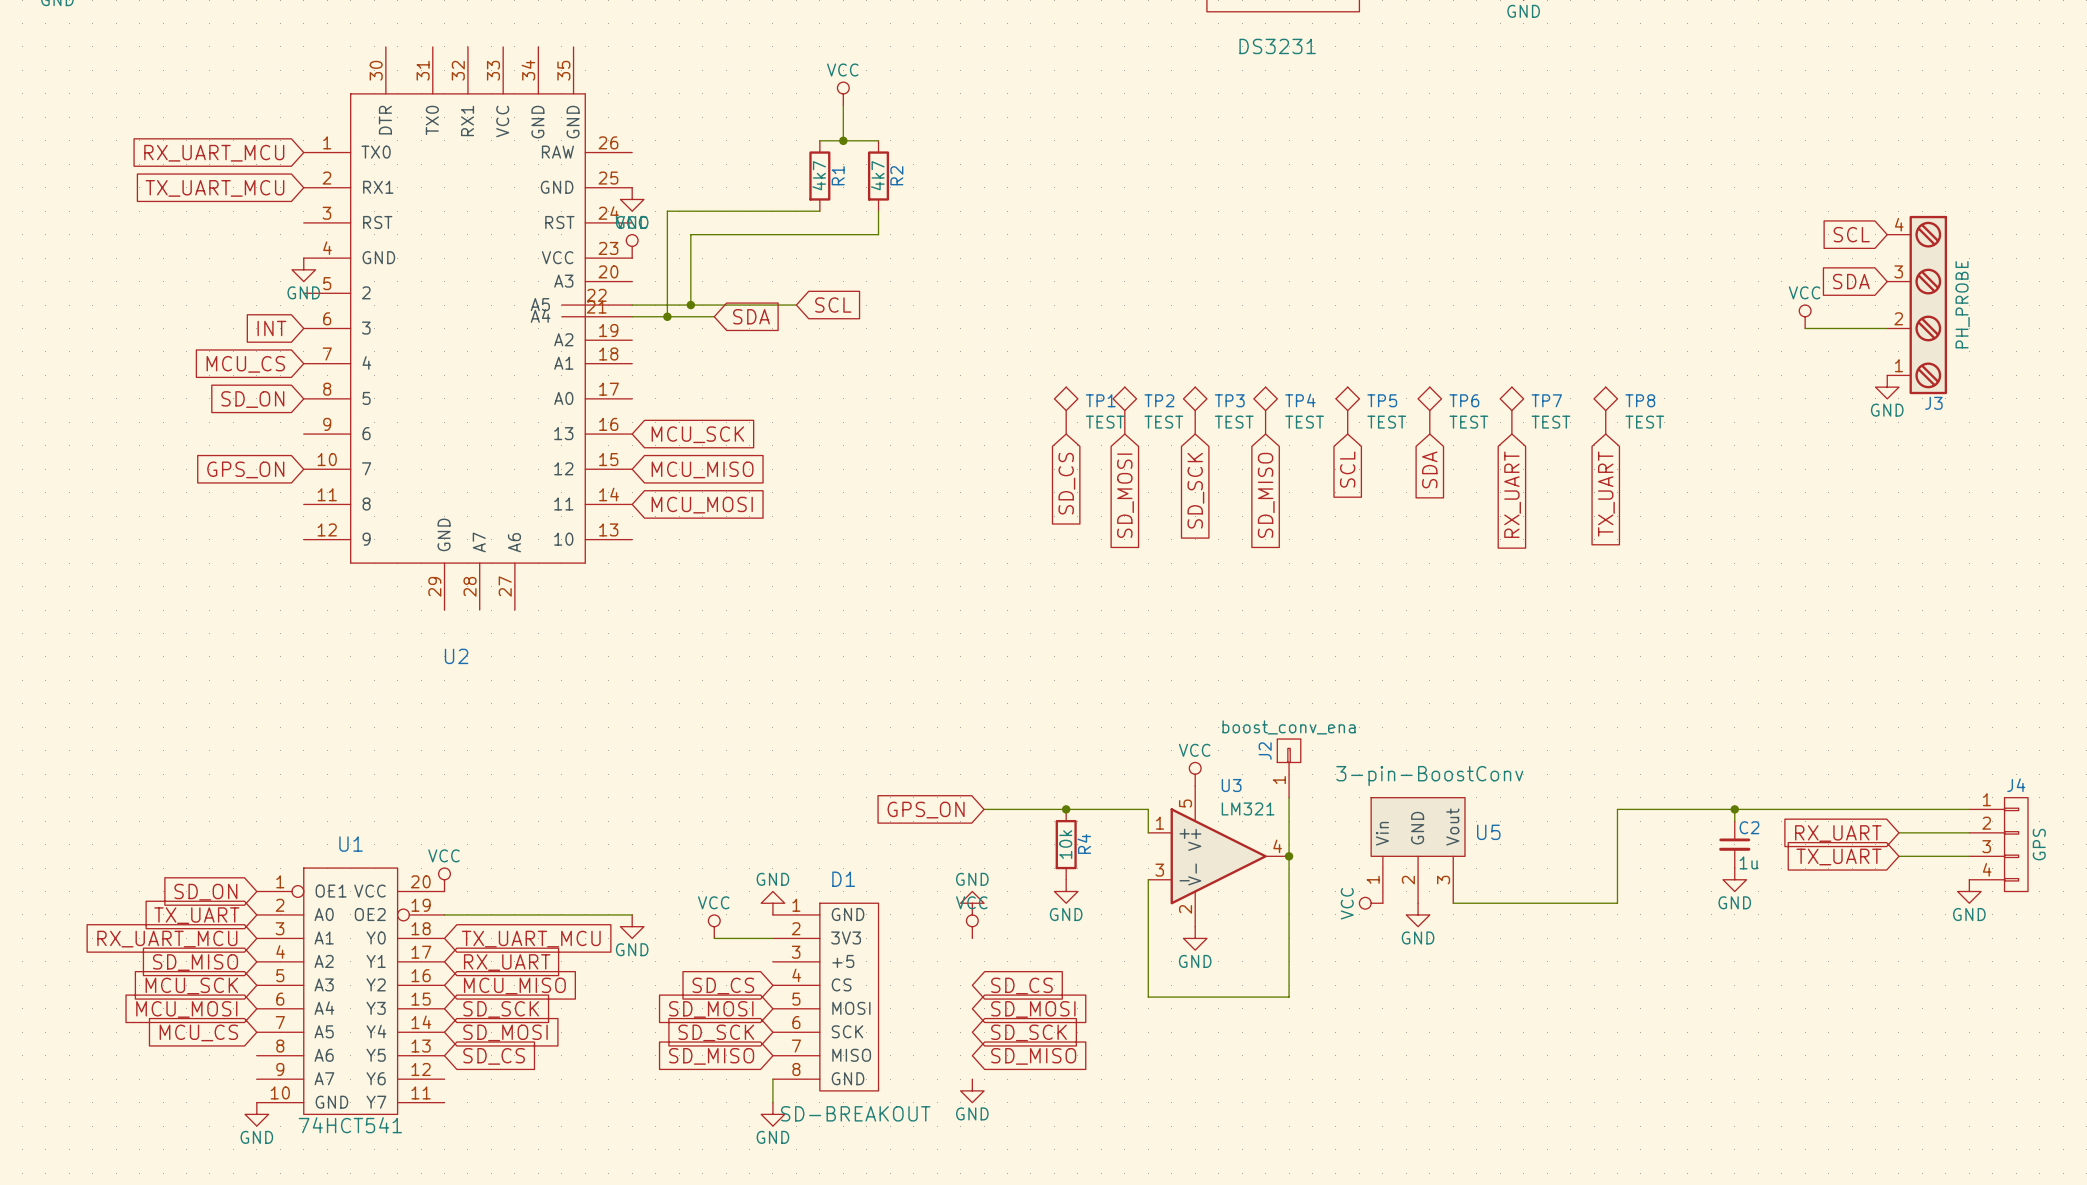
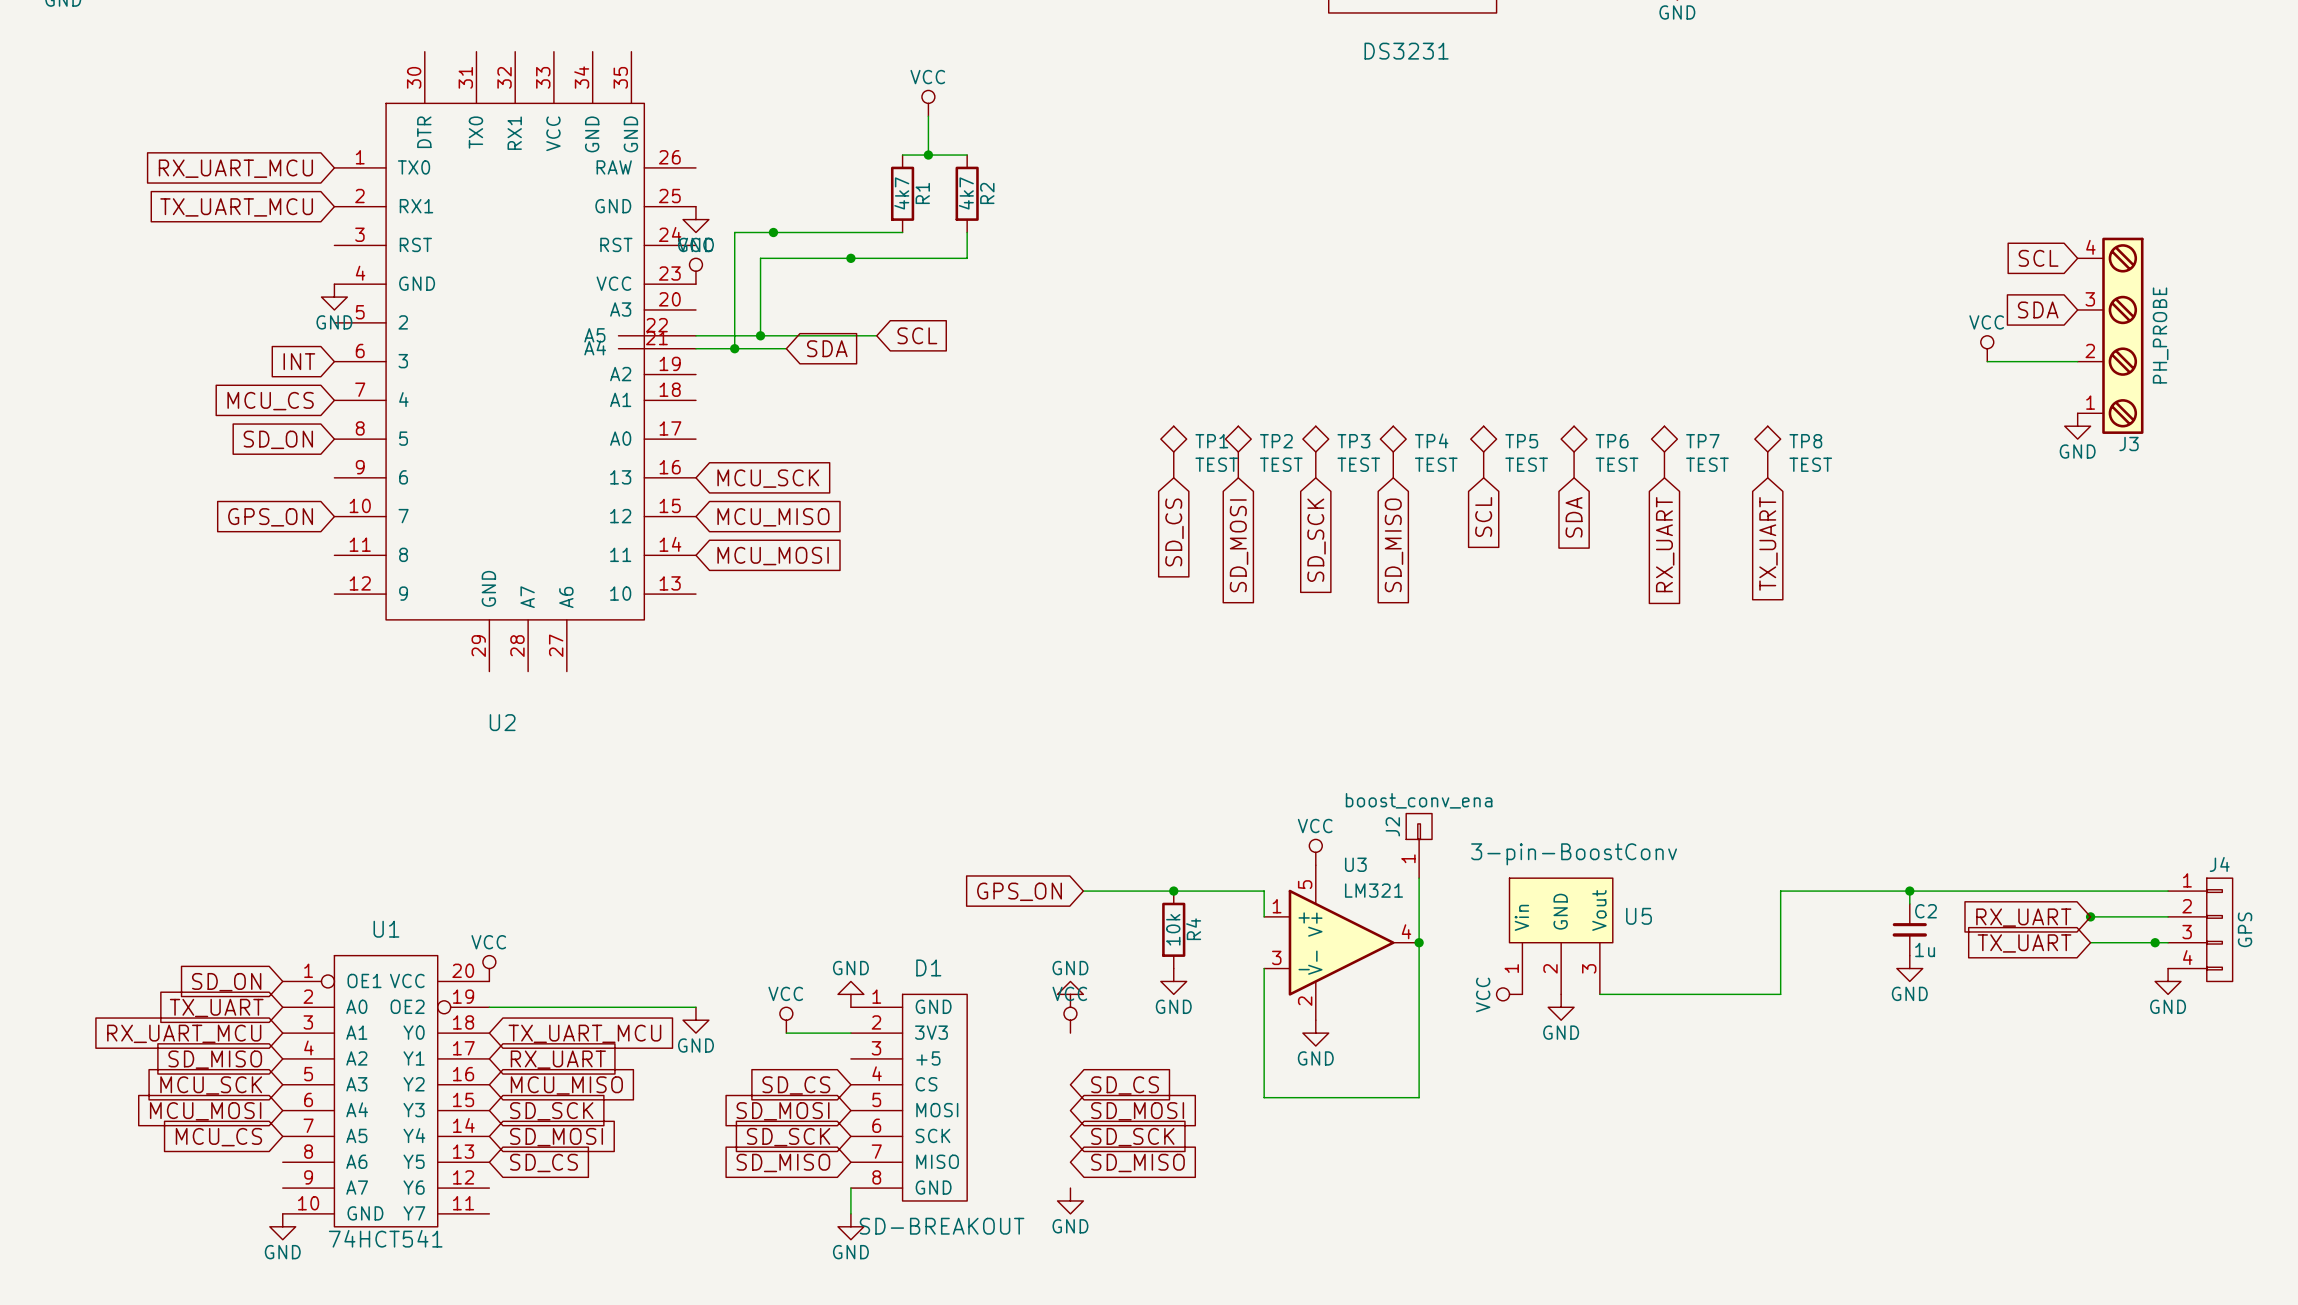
junction: none -> (773, 232)
junction: none -> (850, 258)
junction: none -> (2090, 916)
junction: none -> (2155, 942)

